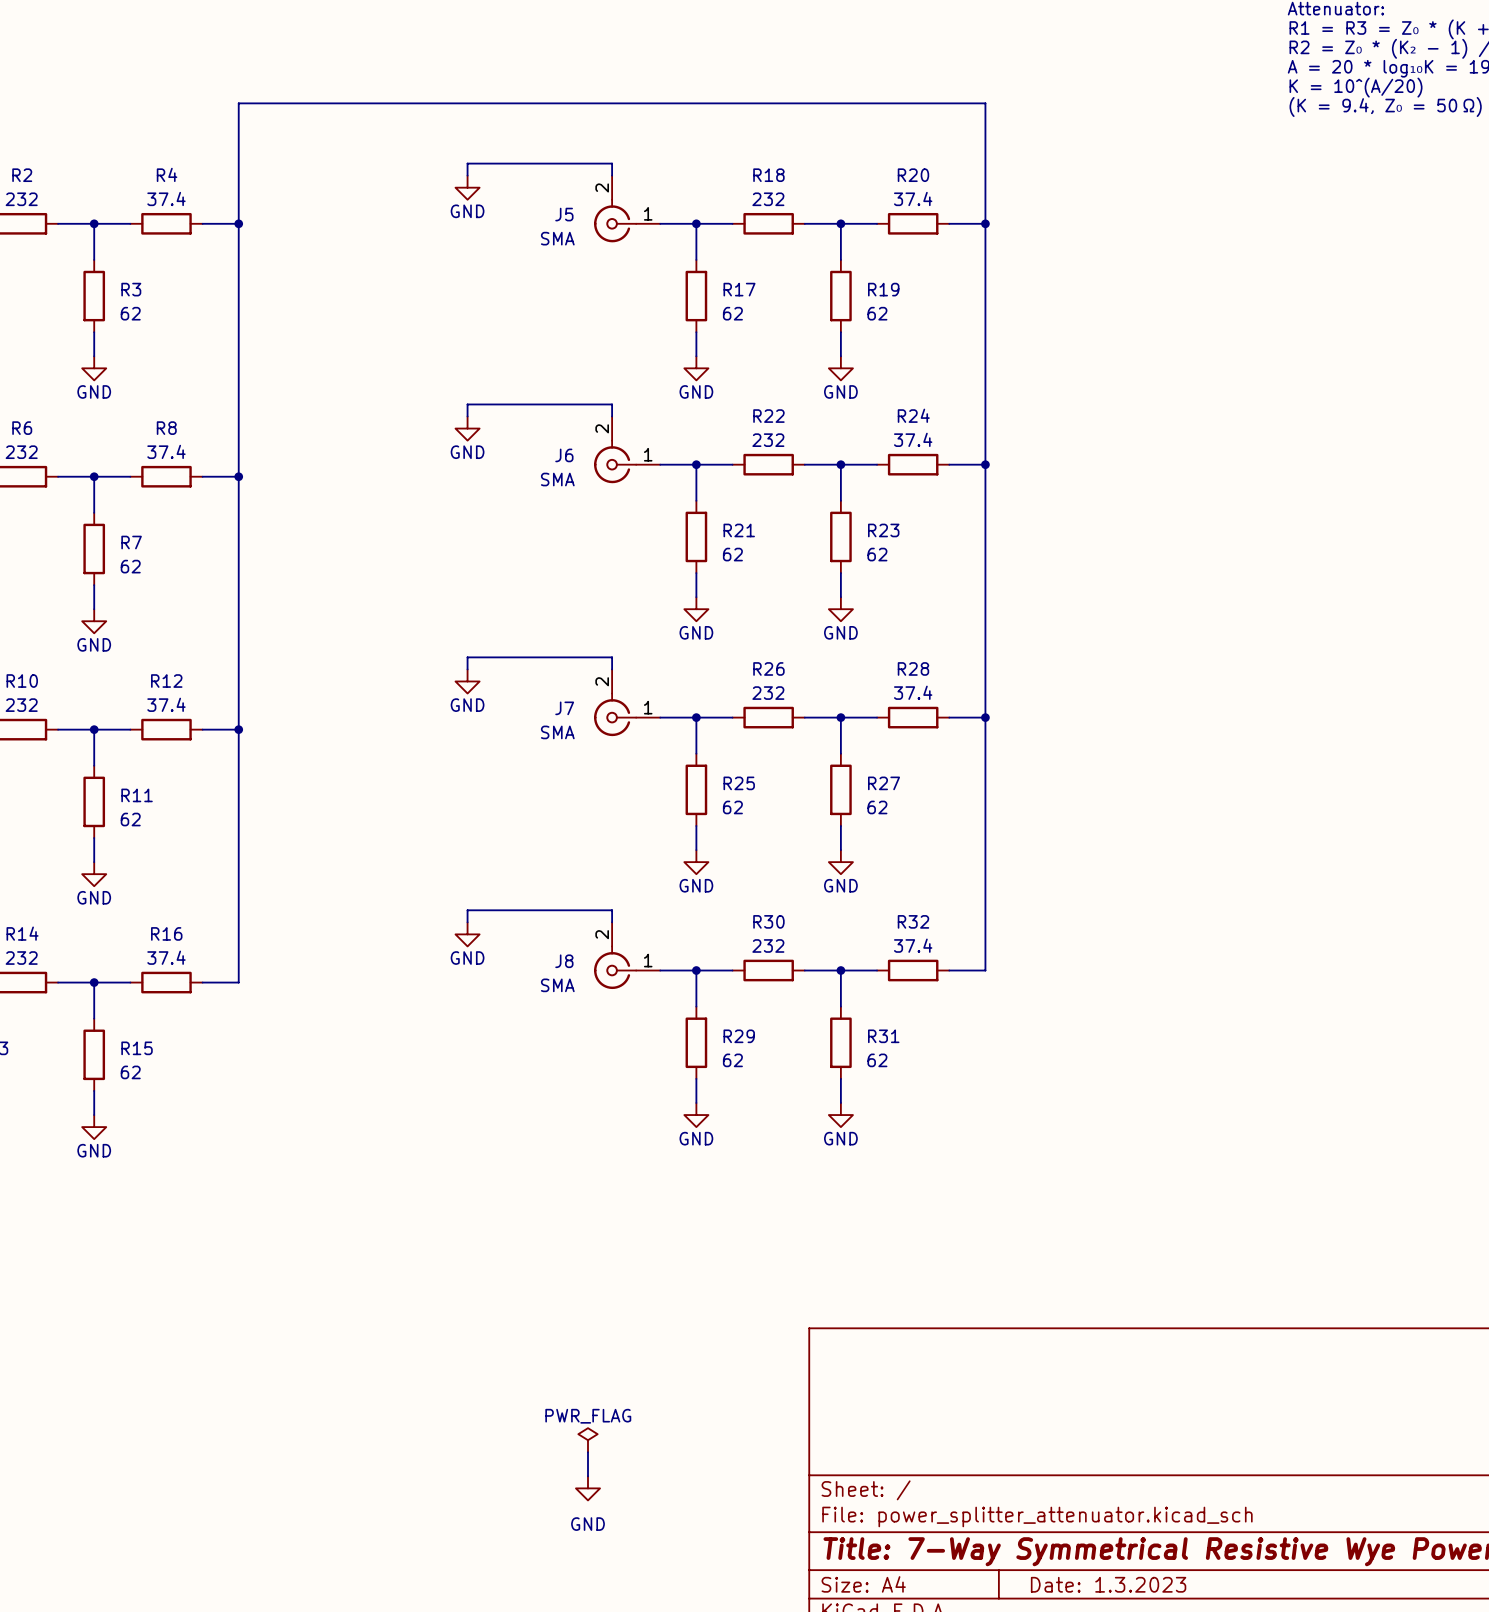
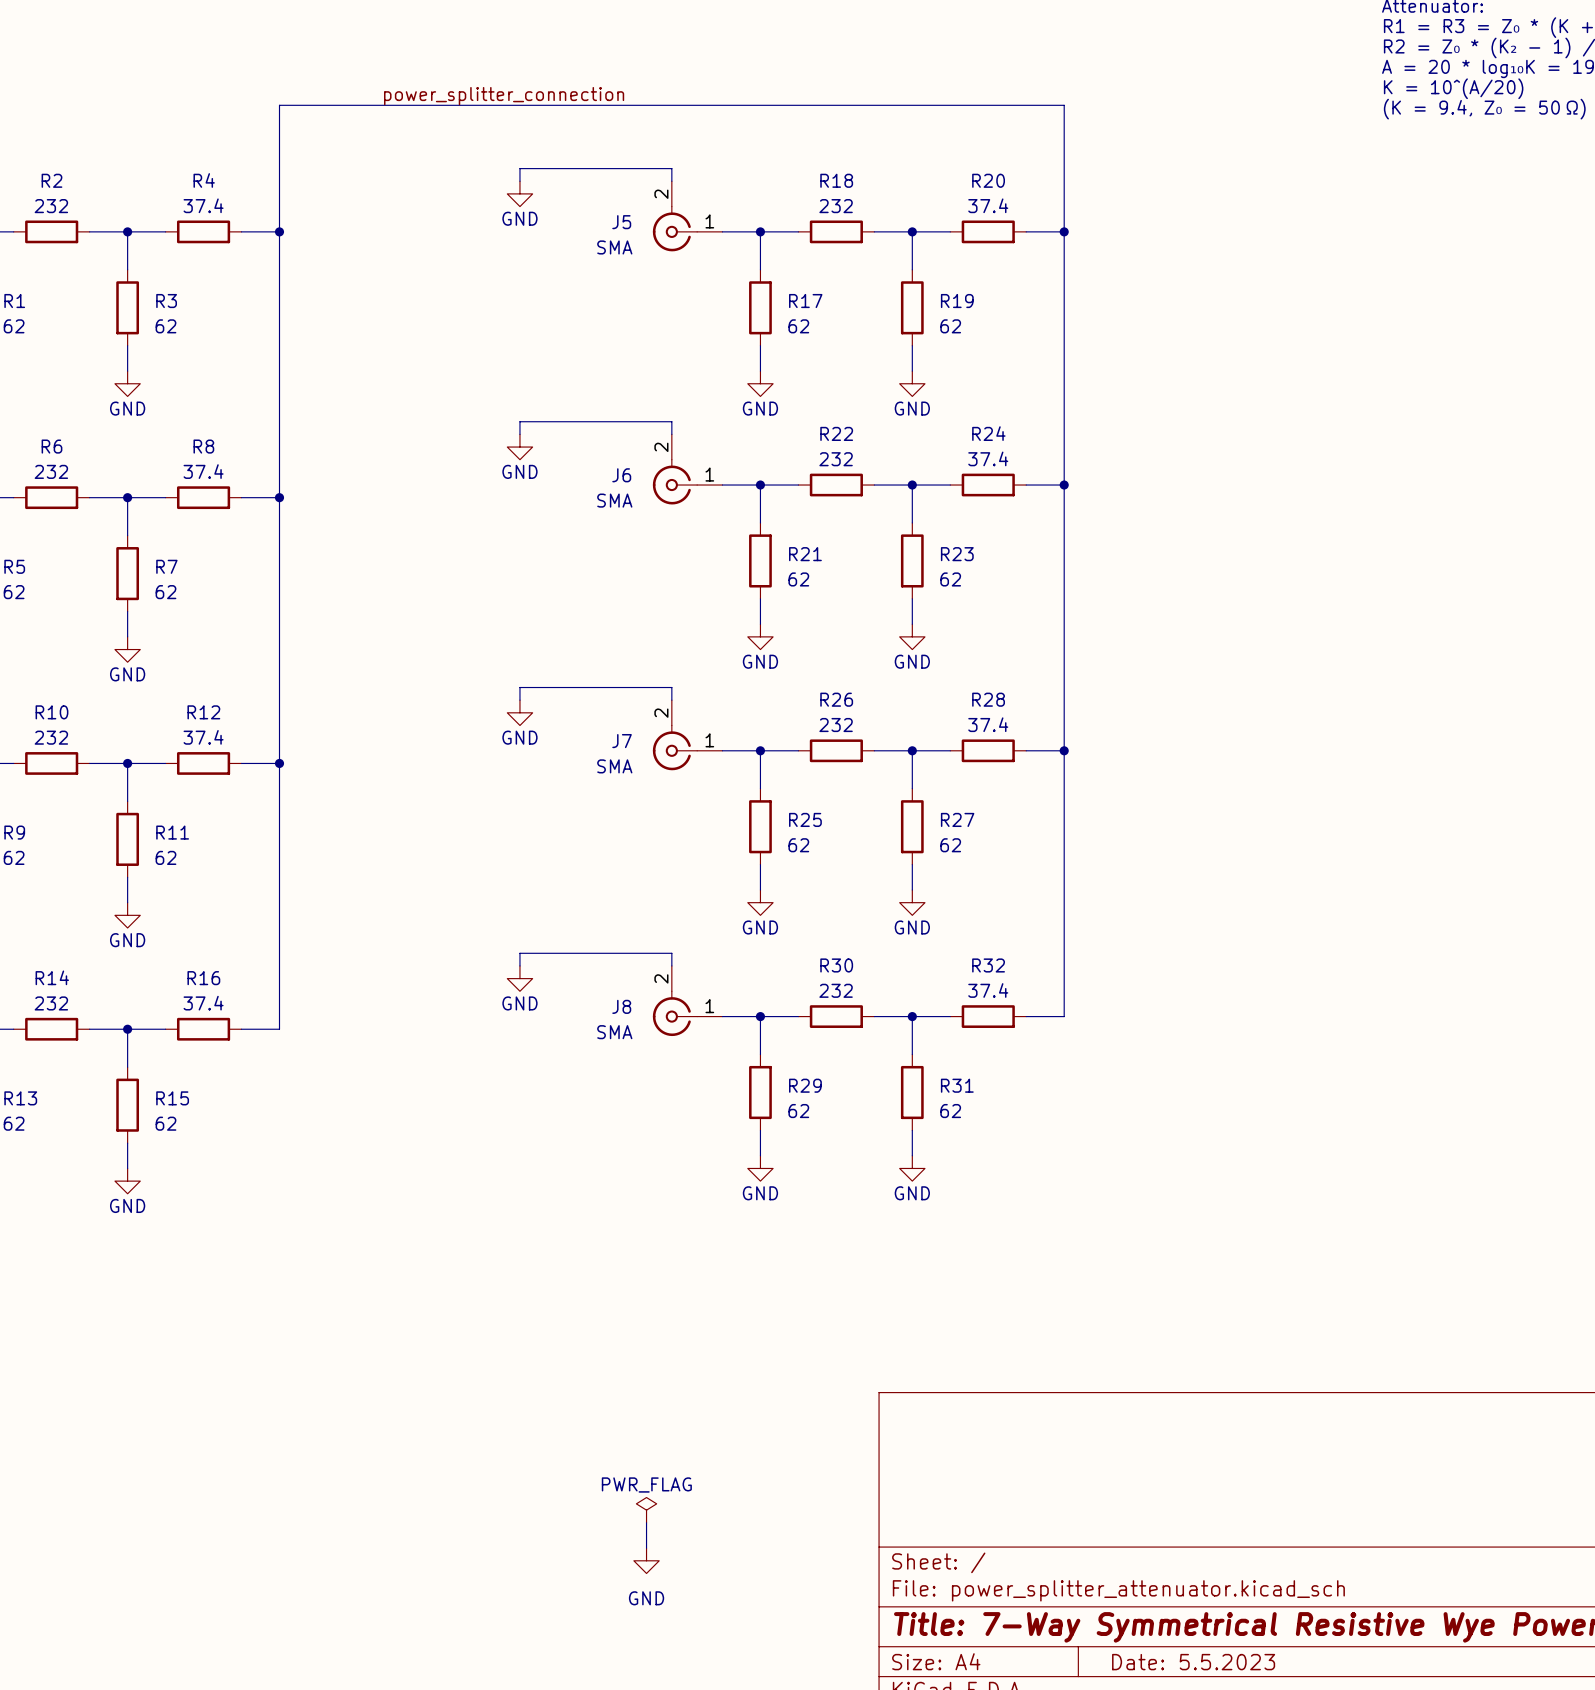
label: none -> power_splitter_connection (504, 96)
title block: Date: 1.3.2023 (1108, 1584) -> Date: 5.5.2023 (1193, 1662)

